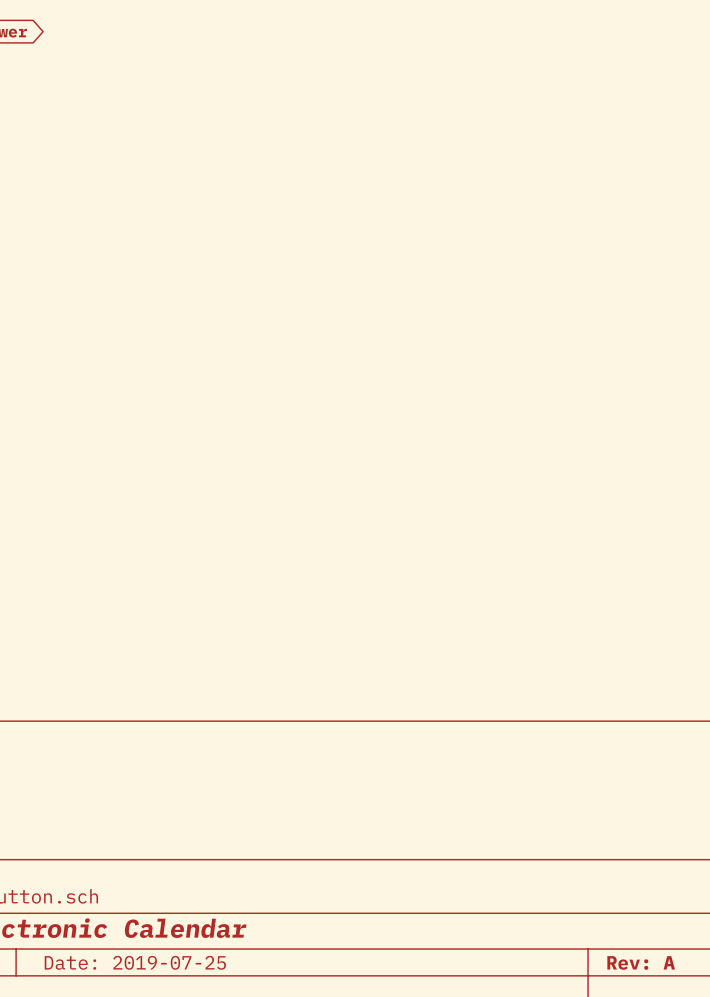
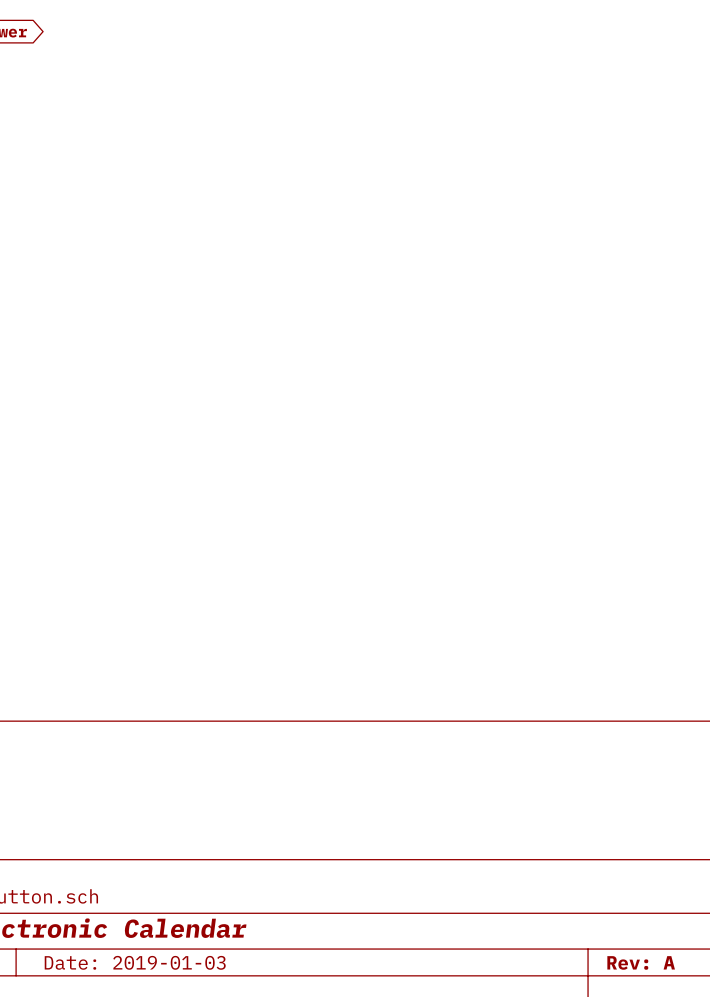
title block: Date: 2019-07-25 (135, 962) -> Date: 2019-01-03 (135, 962)

